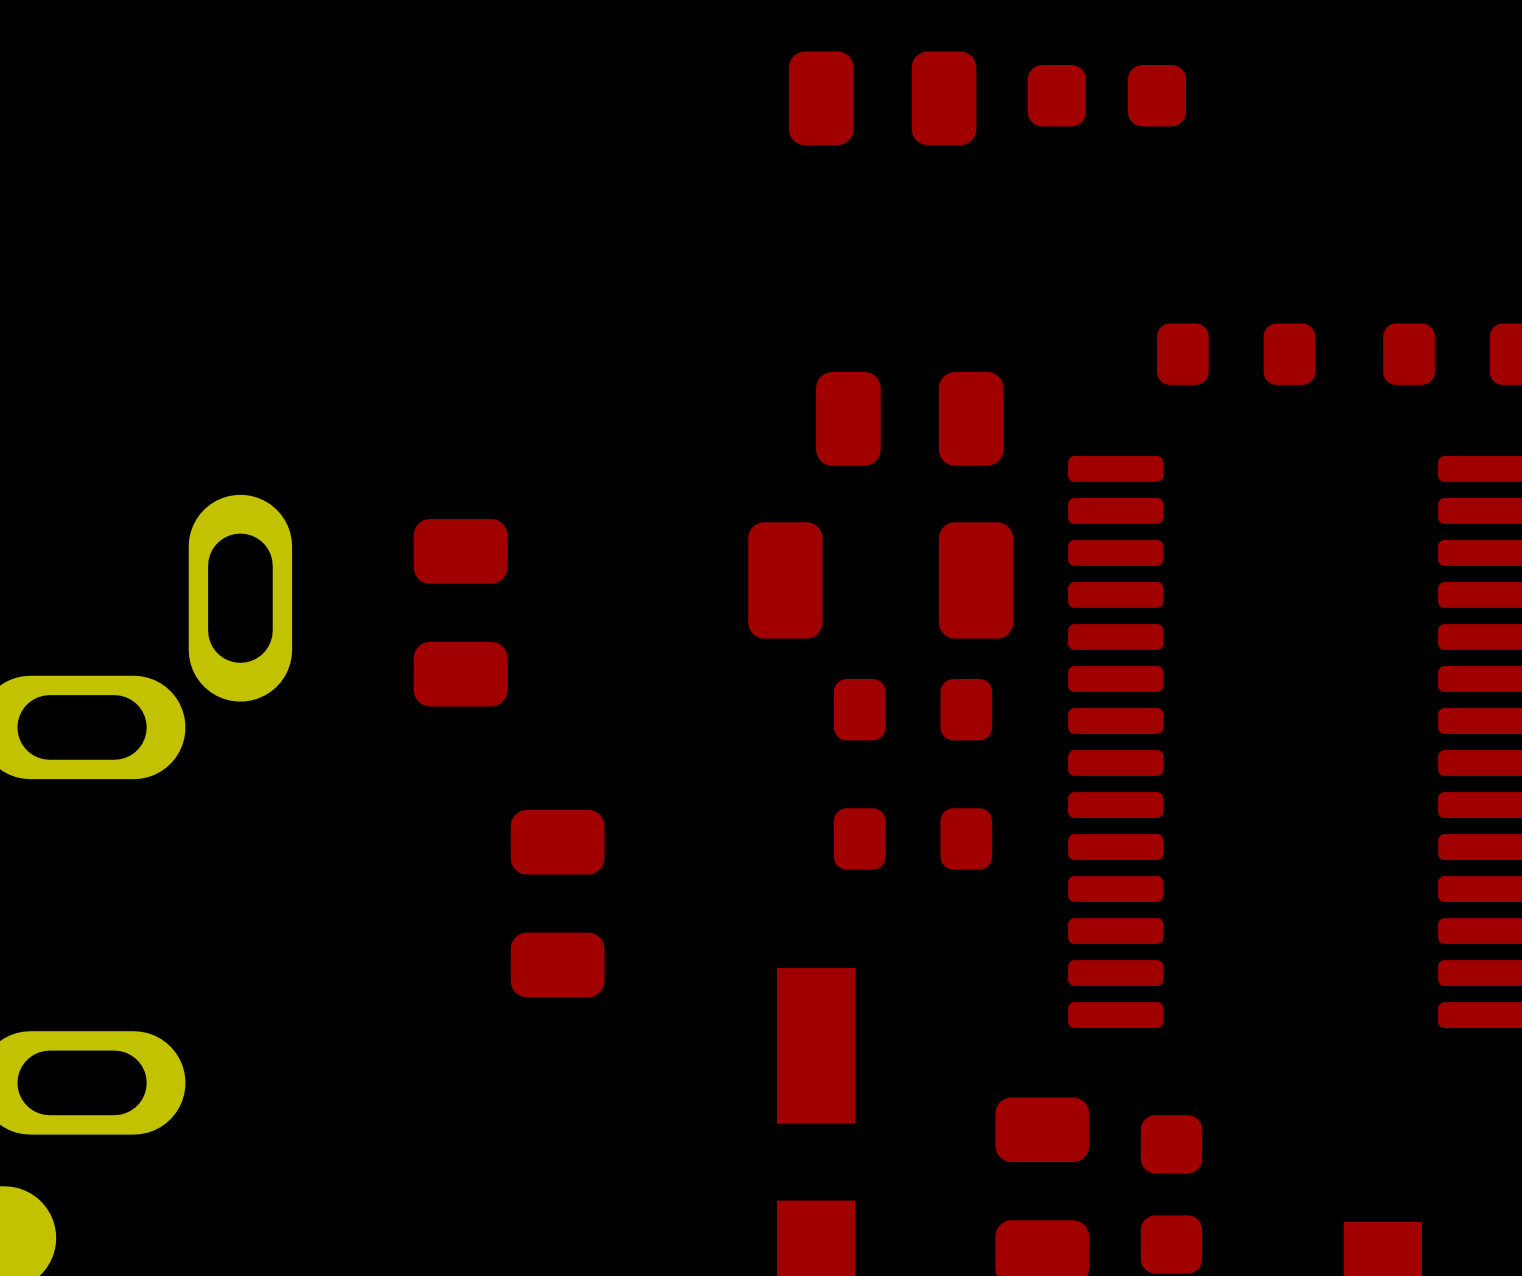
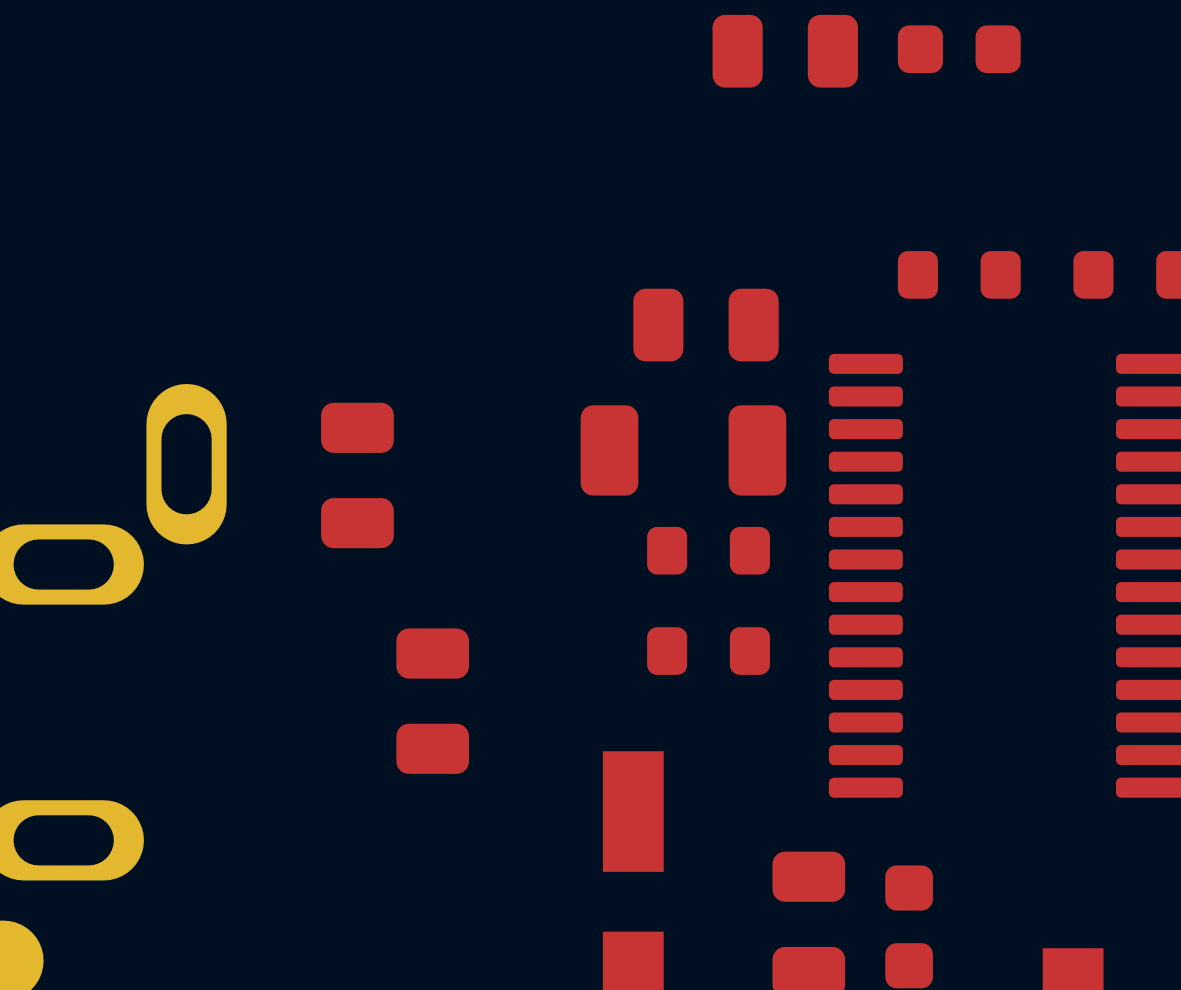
part position: (1106, 95) -> (959, 49)
part position: (882, 98) -> (785, 51)

